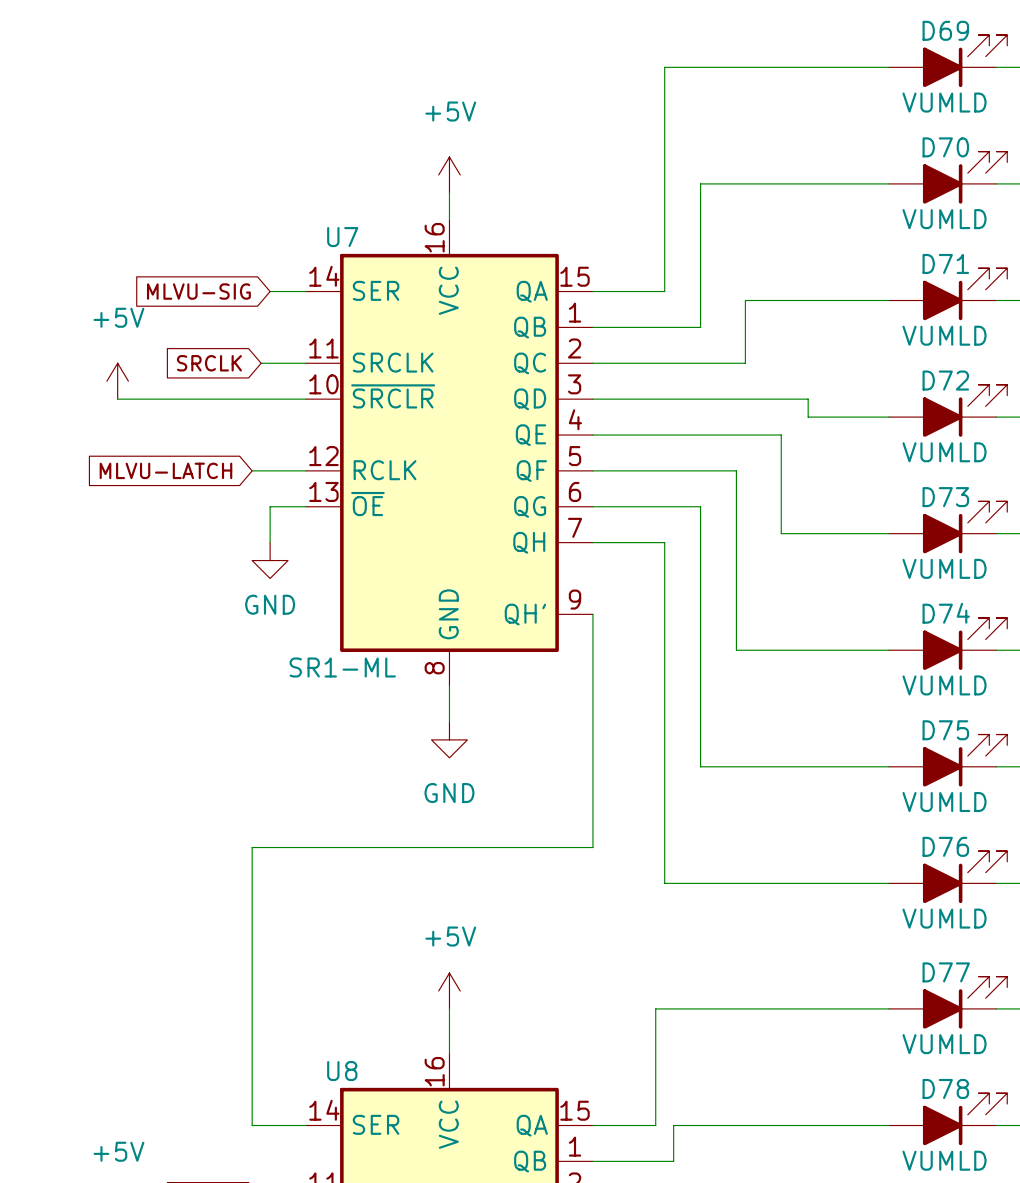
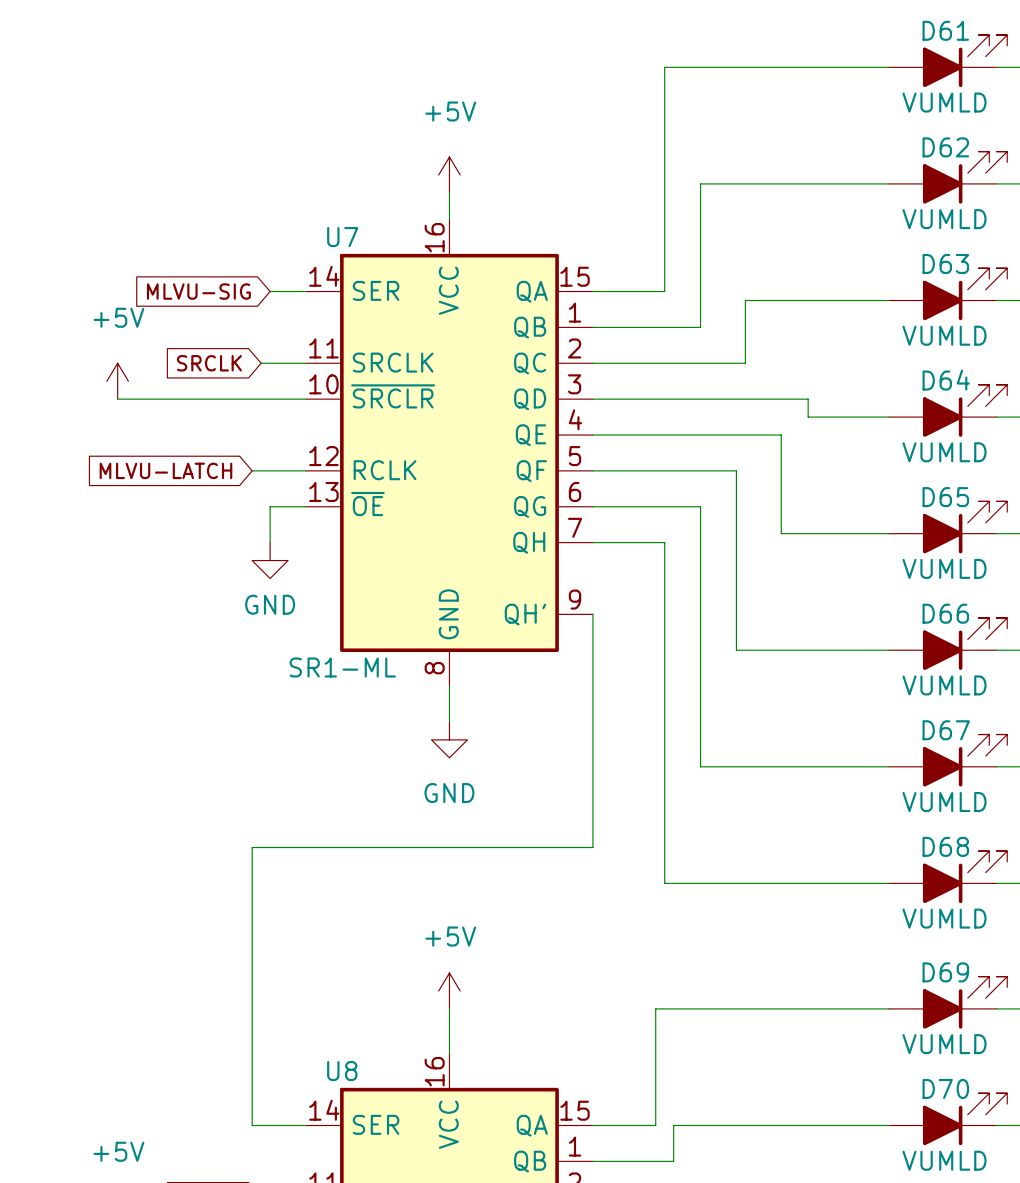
D69 name: D69 (945, 30) -> D61 (945, 30)
D70 name: D70 (945, 147) -> D62 (945, 147)
D71 name: D71 (945, 263) -> D63 (945, 263)
D72 name: D72 (945, 380) -> D64 (946, 380)
D73 name: D73 (945, 497) -> D65 (945, 497)
D74 name: D74 (946, 613) -> D66 (945, 613)
D75 name: D75 (945, 730) -> D67 (946, 730)
D76 name: D76 (945, 846) -> D68 (945, 846)
D77 name: D77 (946, 972) -> D69 (945, 972)
D78 name: D78 (945, 1088) -> D70 (945, 1088)

